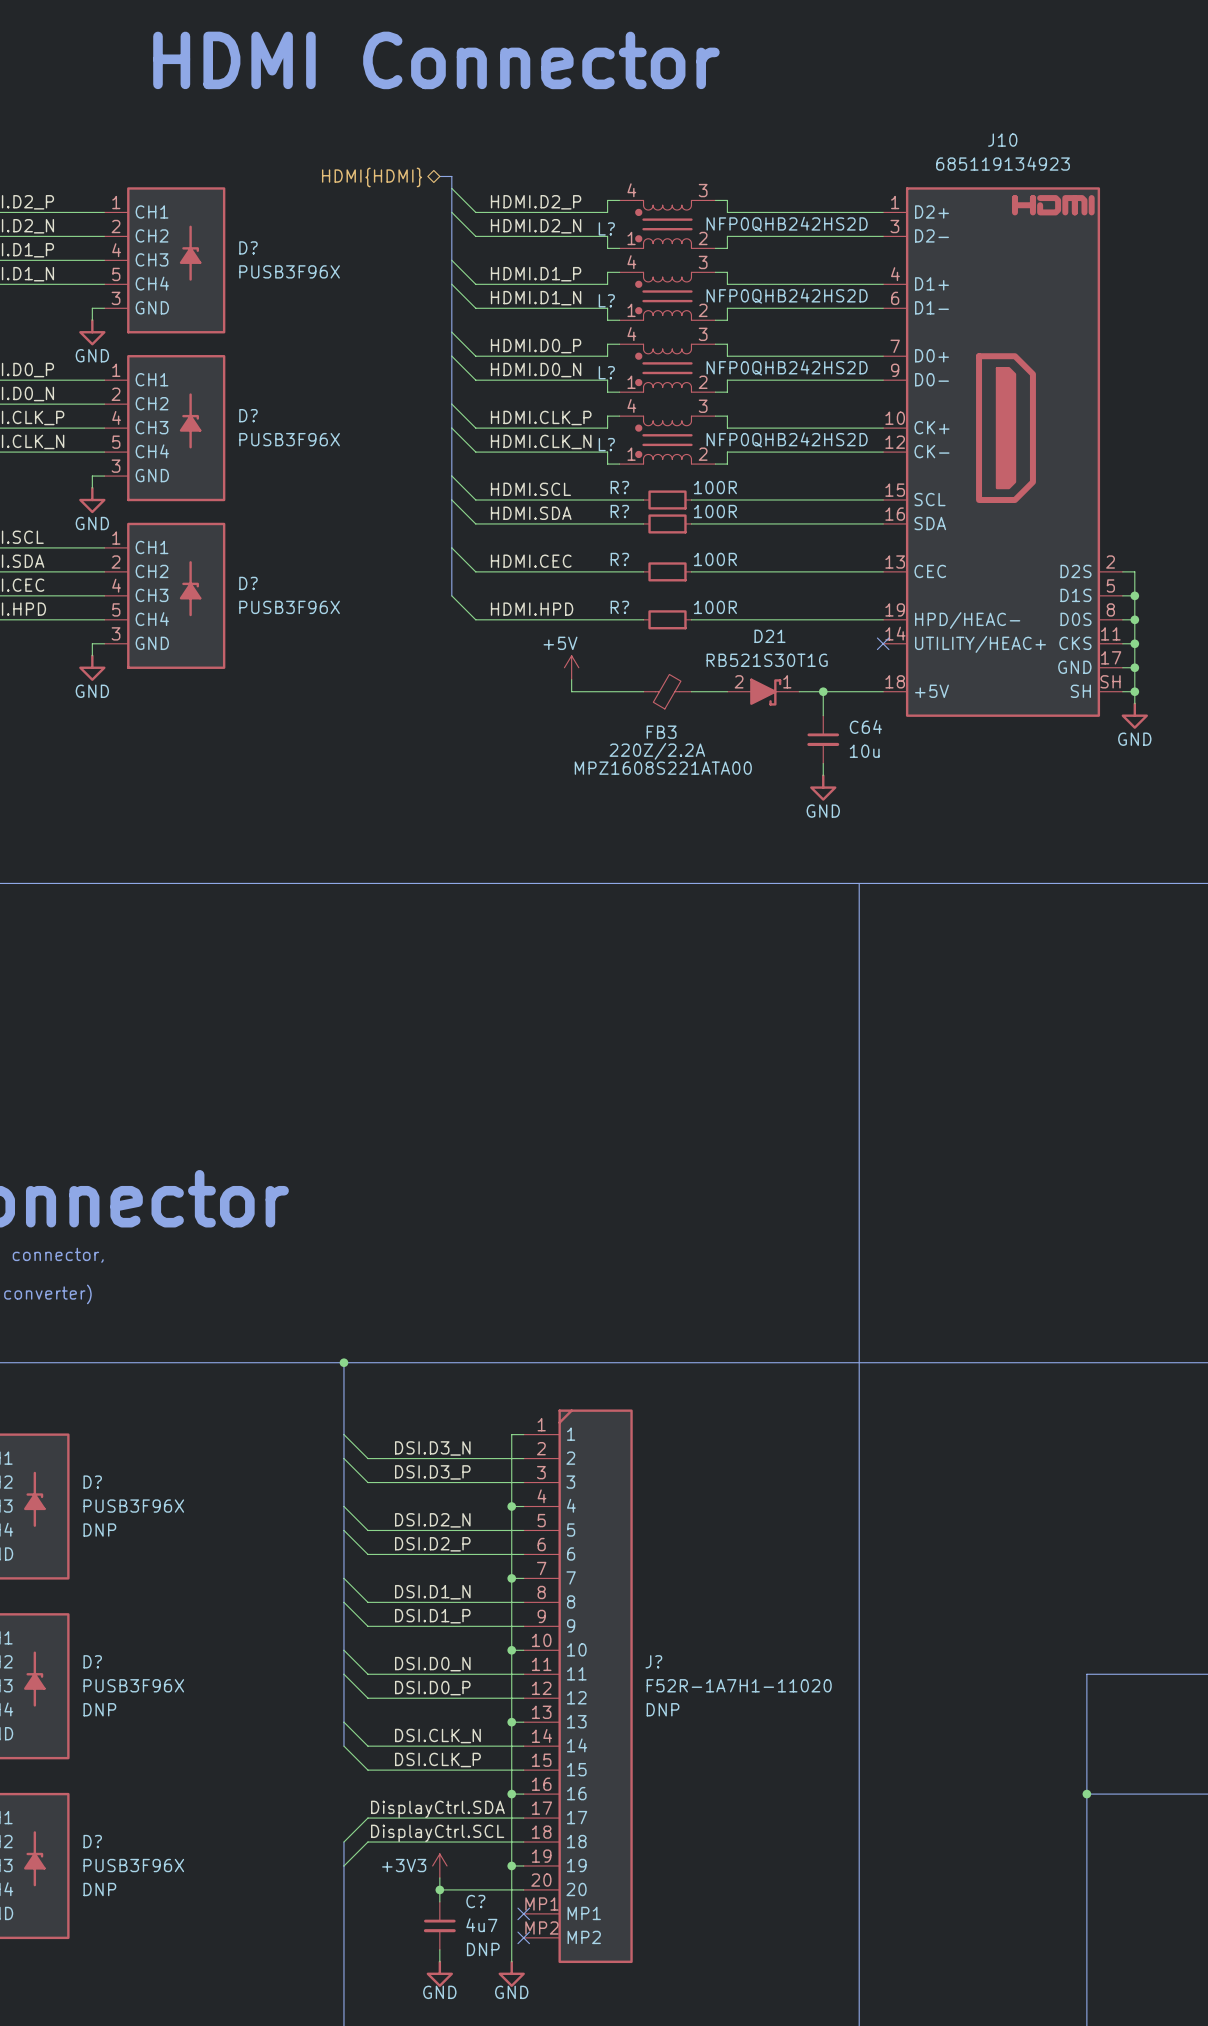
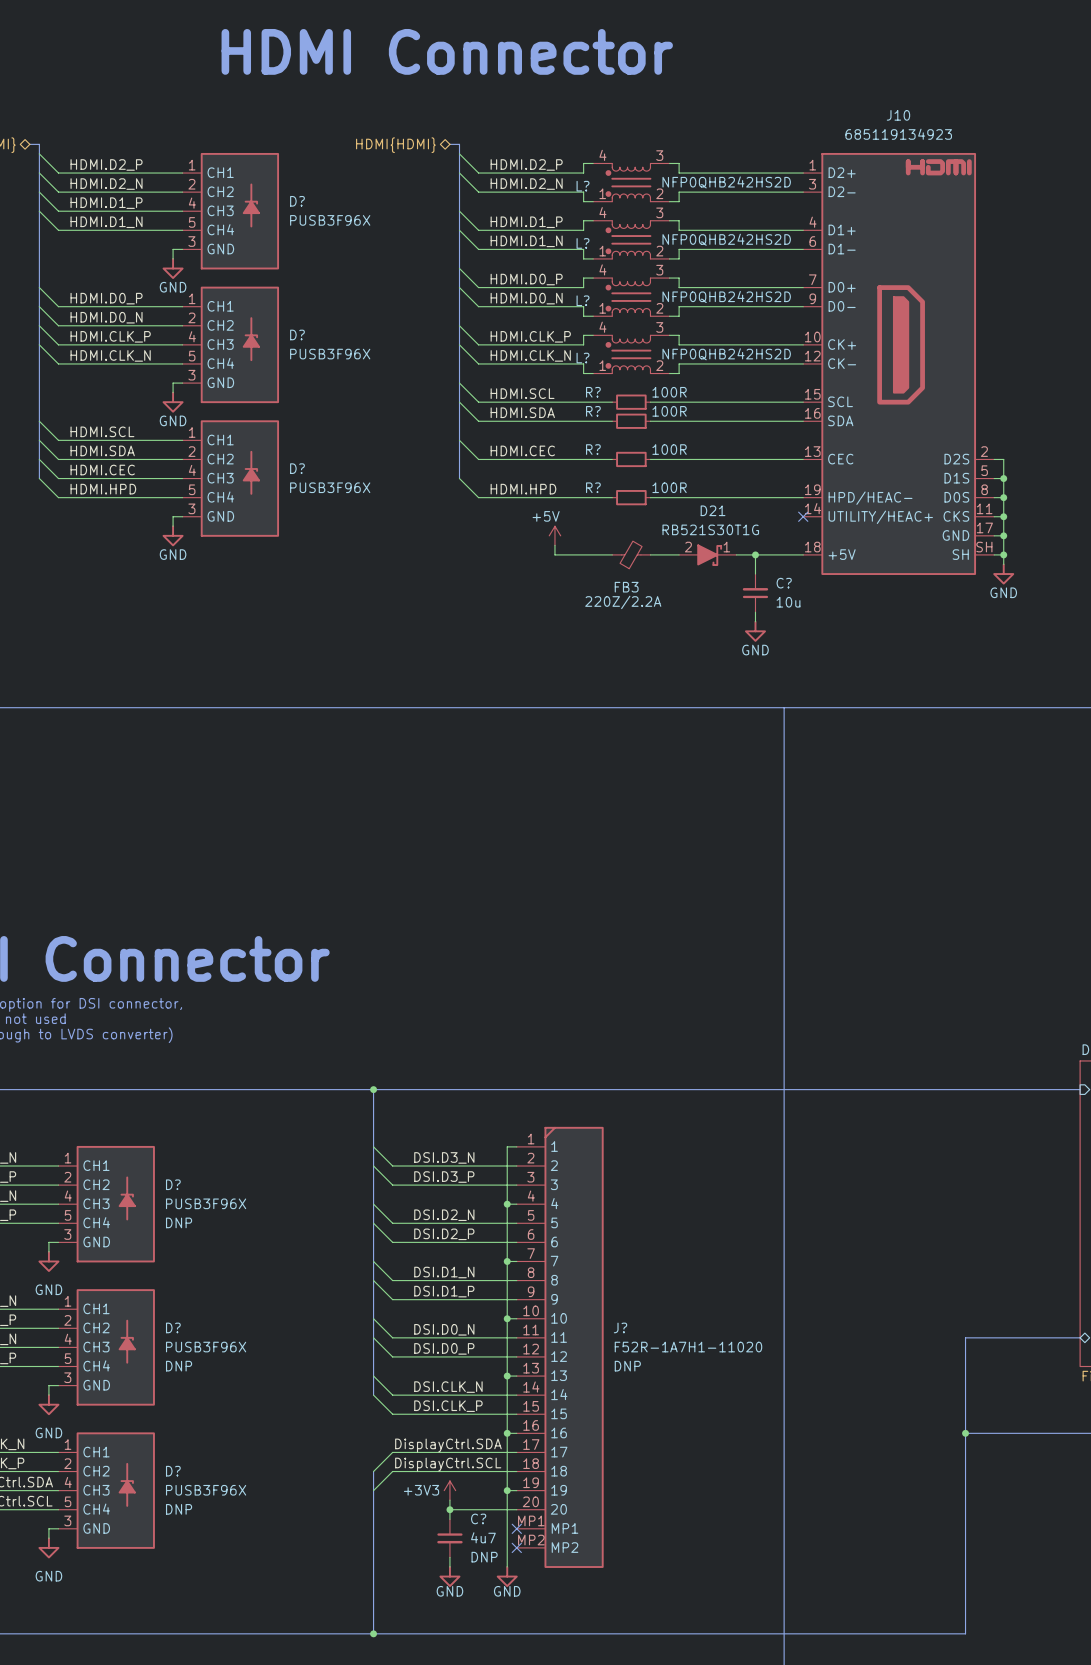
C64: (823, 739) -> none
C?: none -> (755, 593)
FB3 text: MPZ1608S221ATA00 (663, 768) -> none

